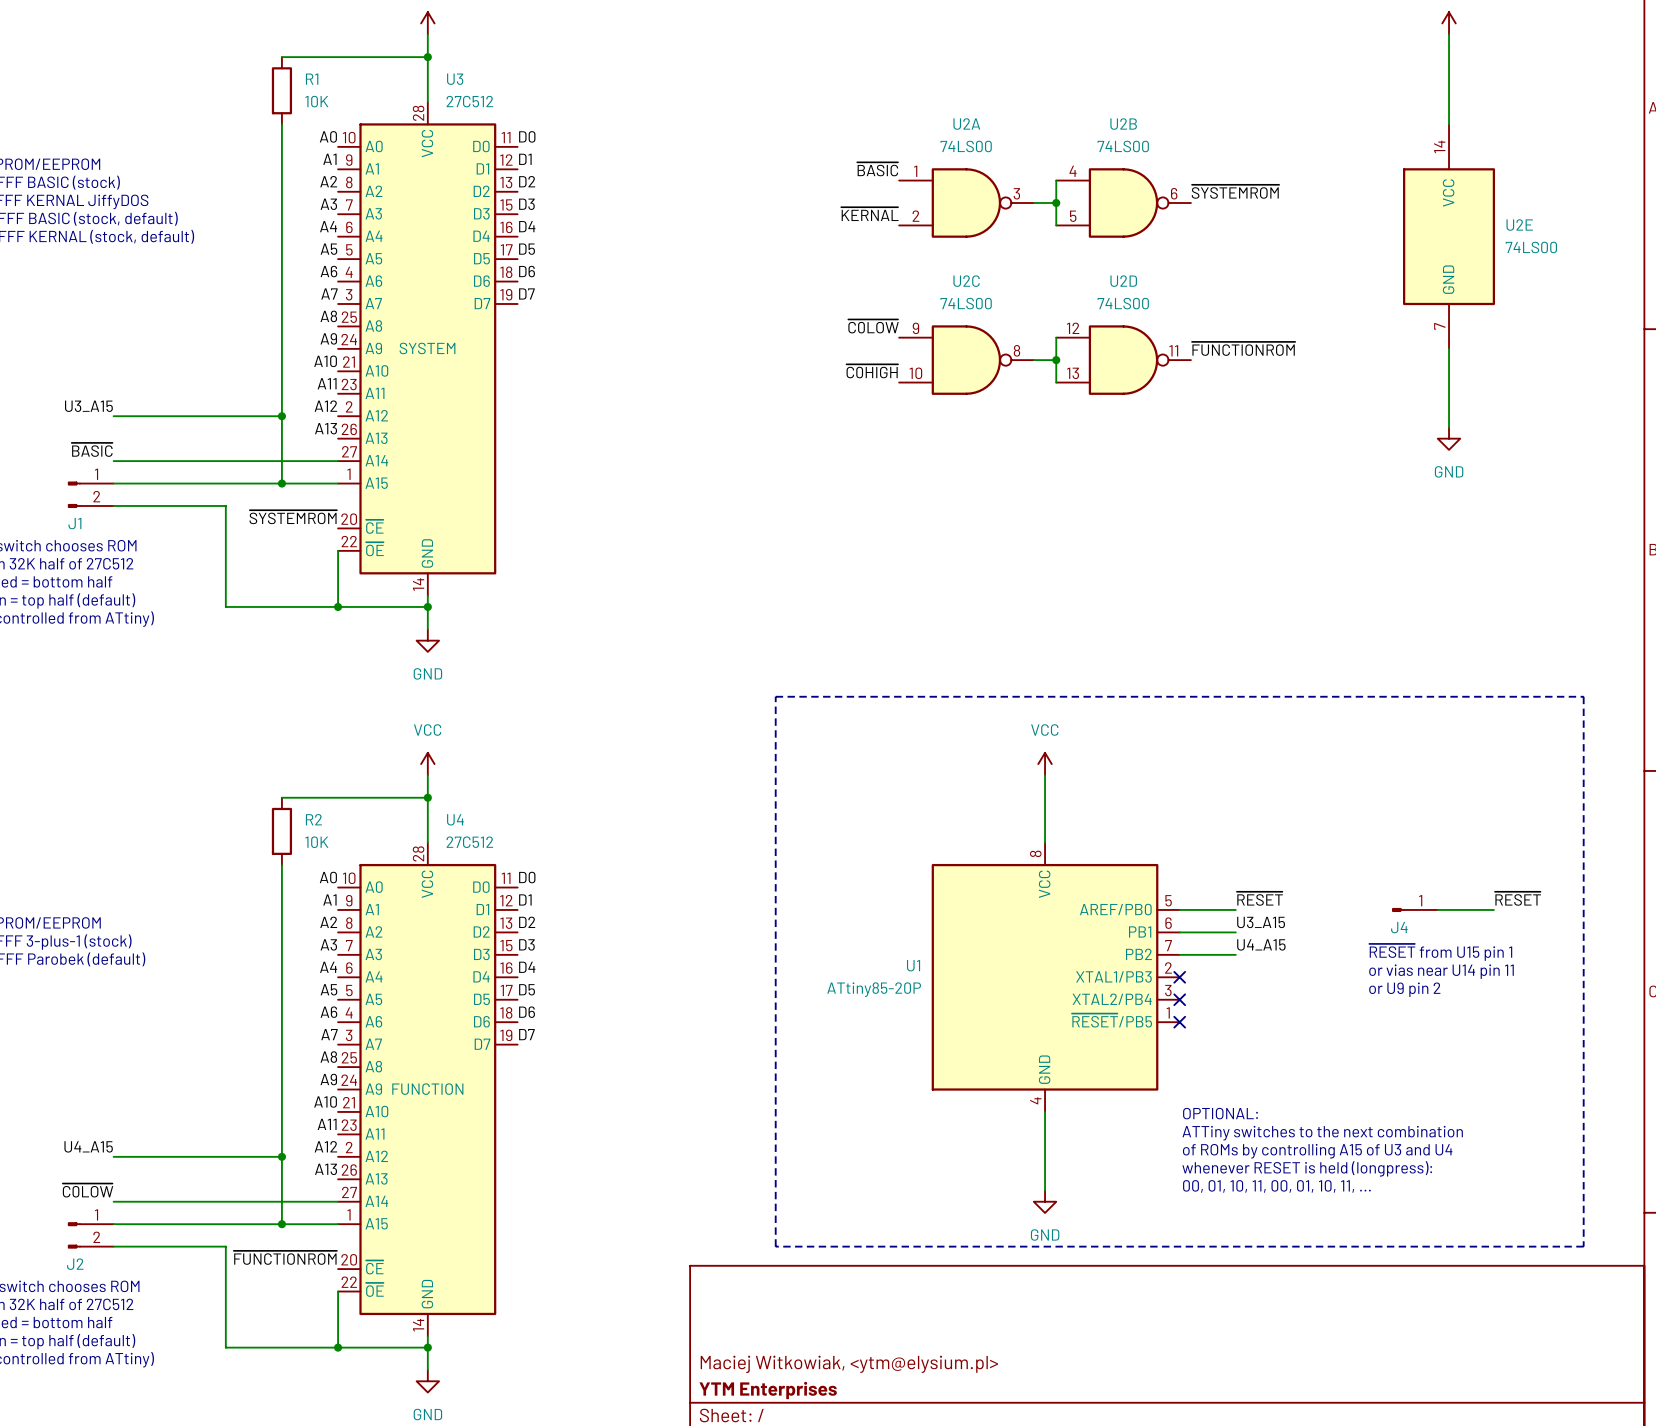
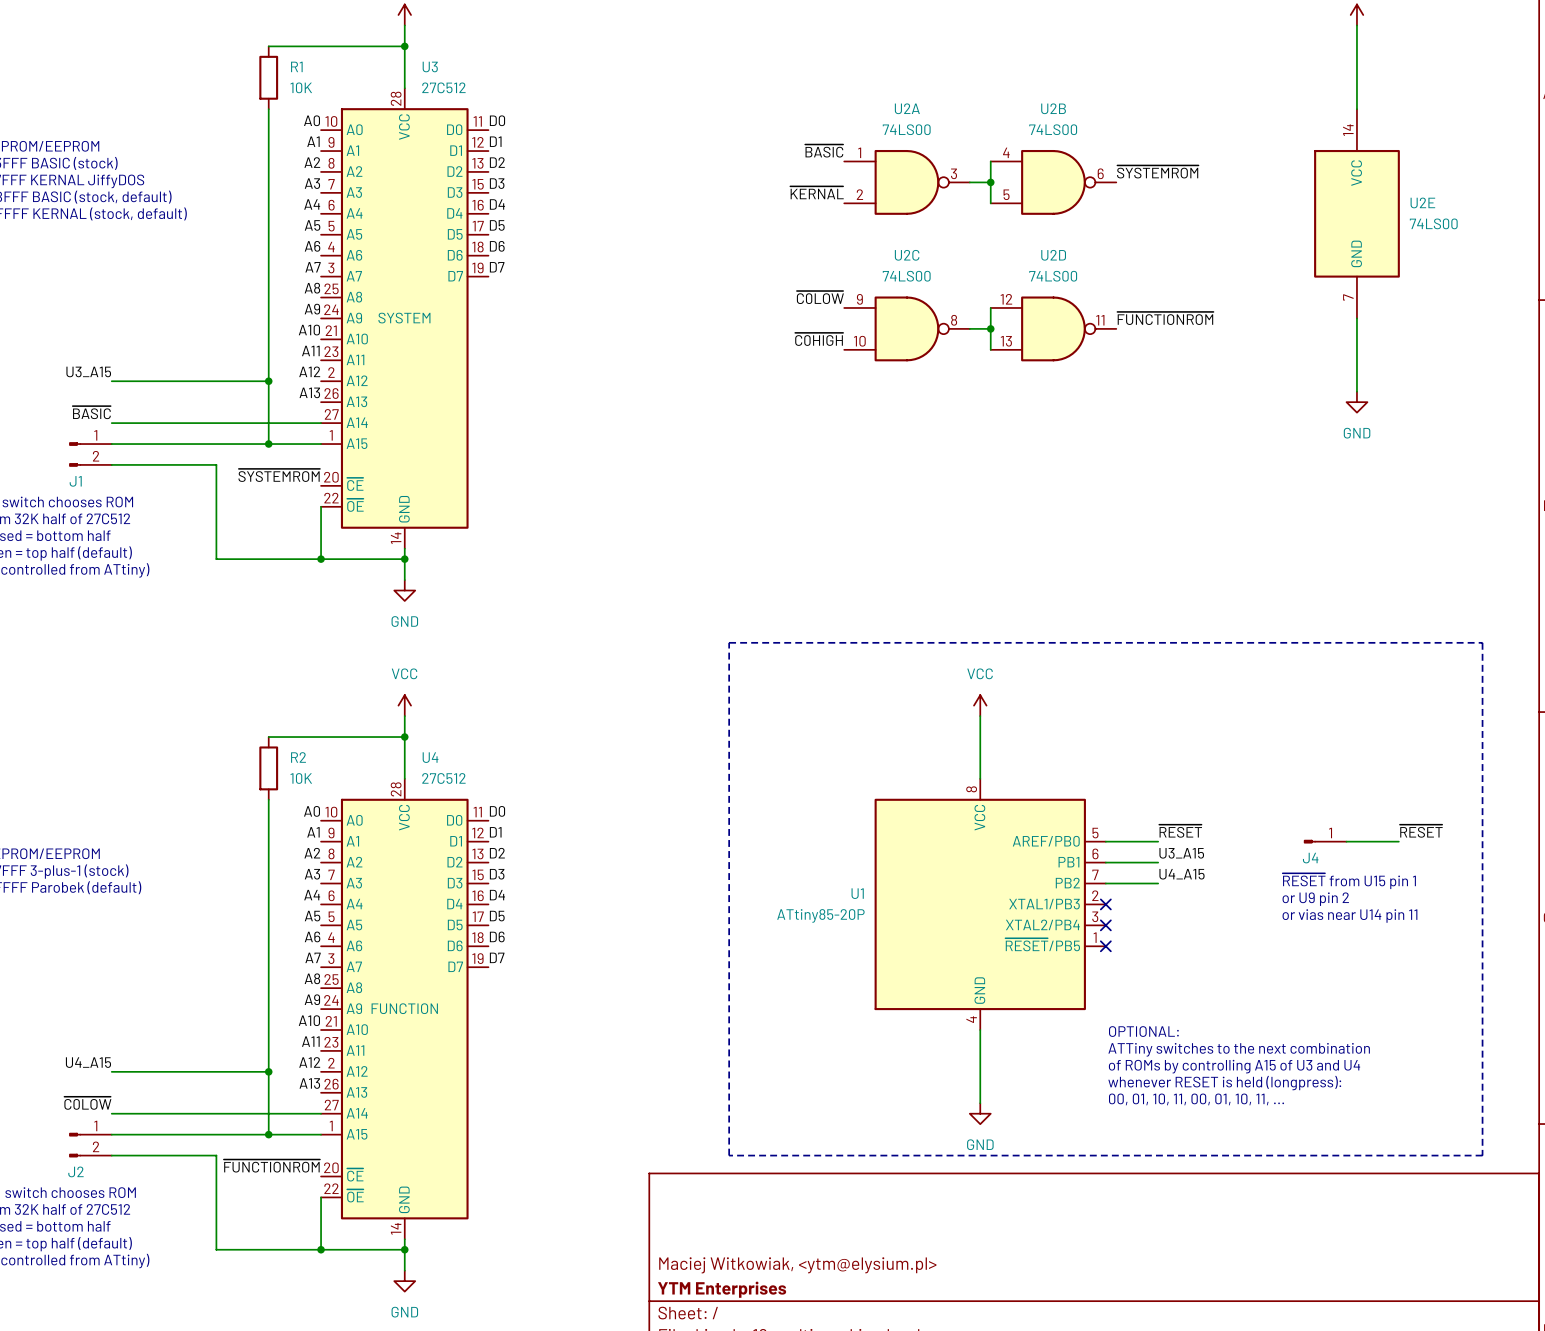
text: or vias near U14 pin 11 (1441, 971) -> or U9 pin 2 (1315, 899)
text: or U9 pin 2 (1404, 989) -> or vias near U14 pin 11 (1349, 916)

